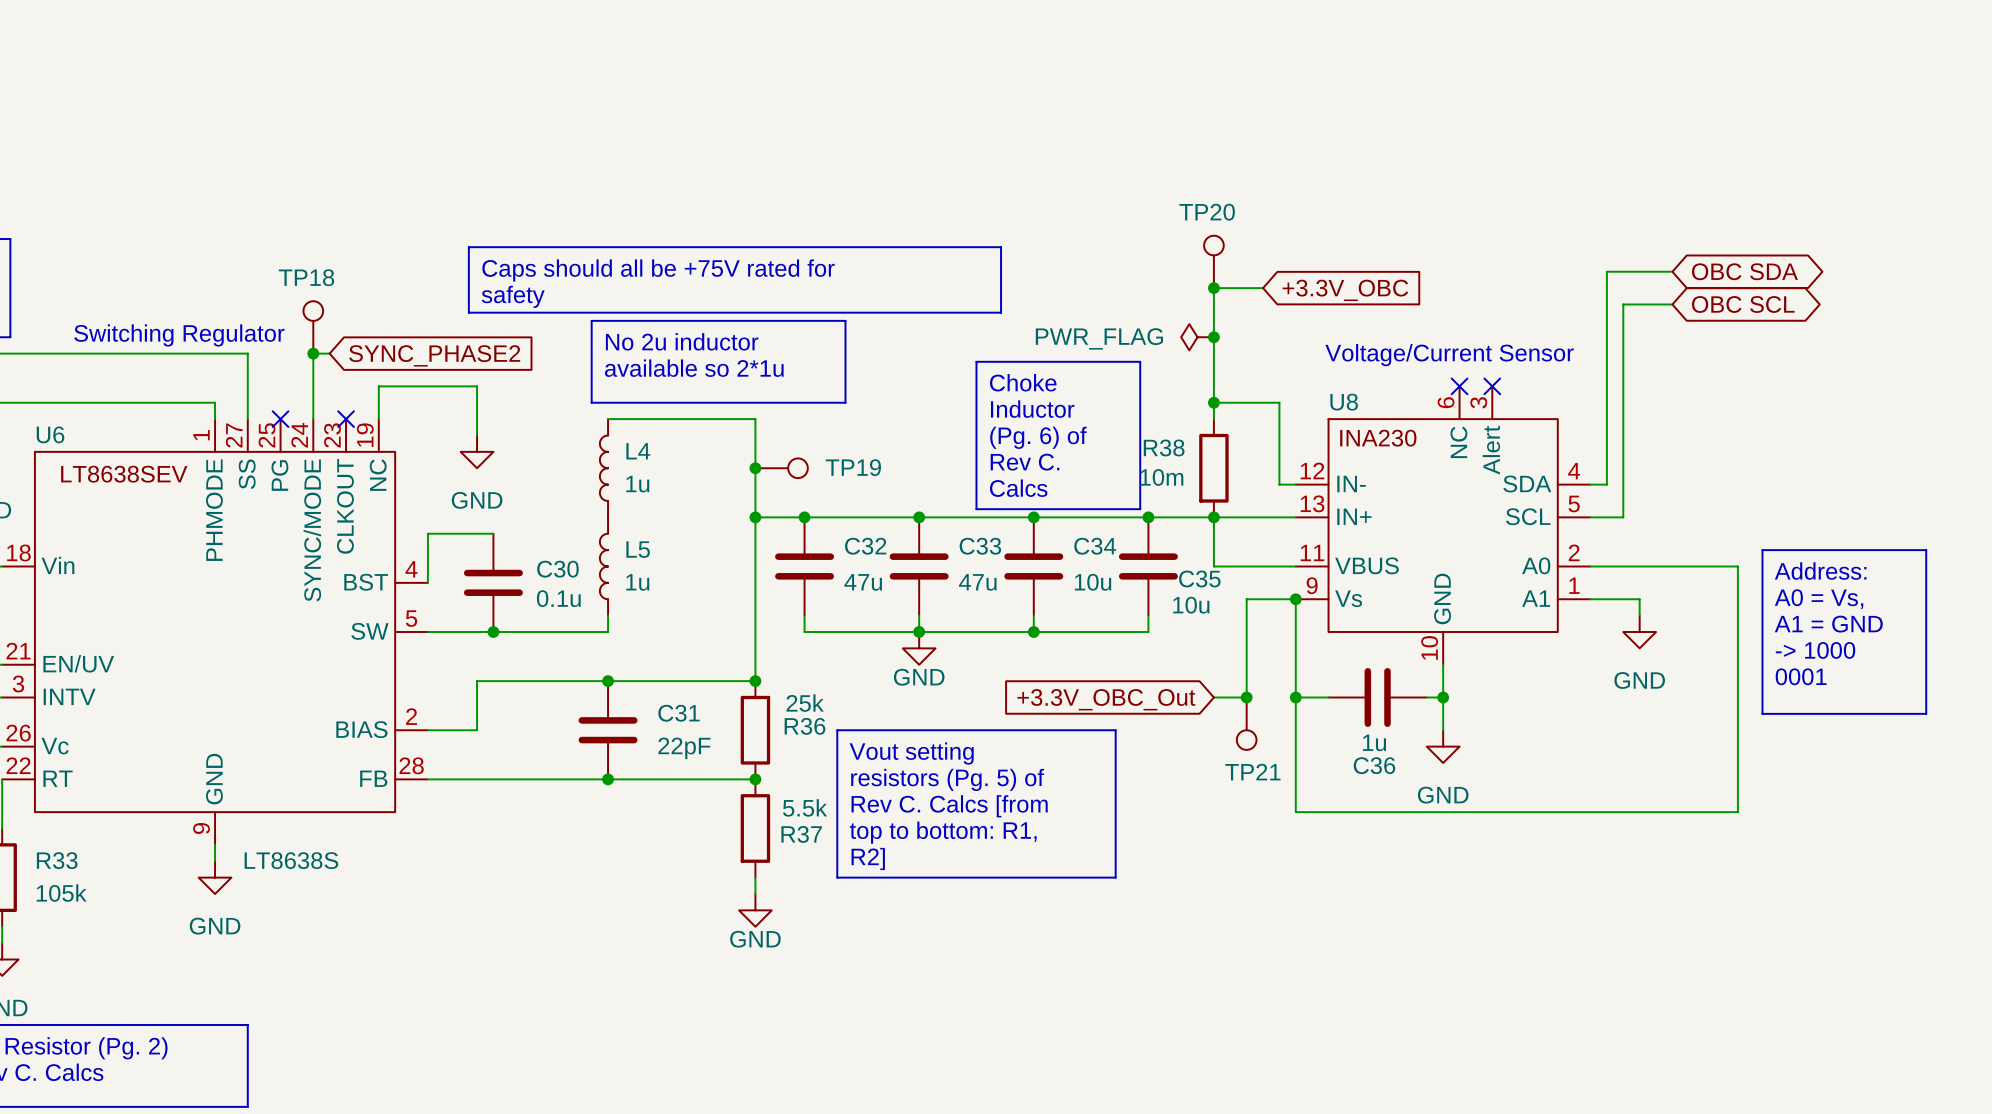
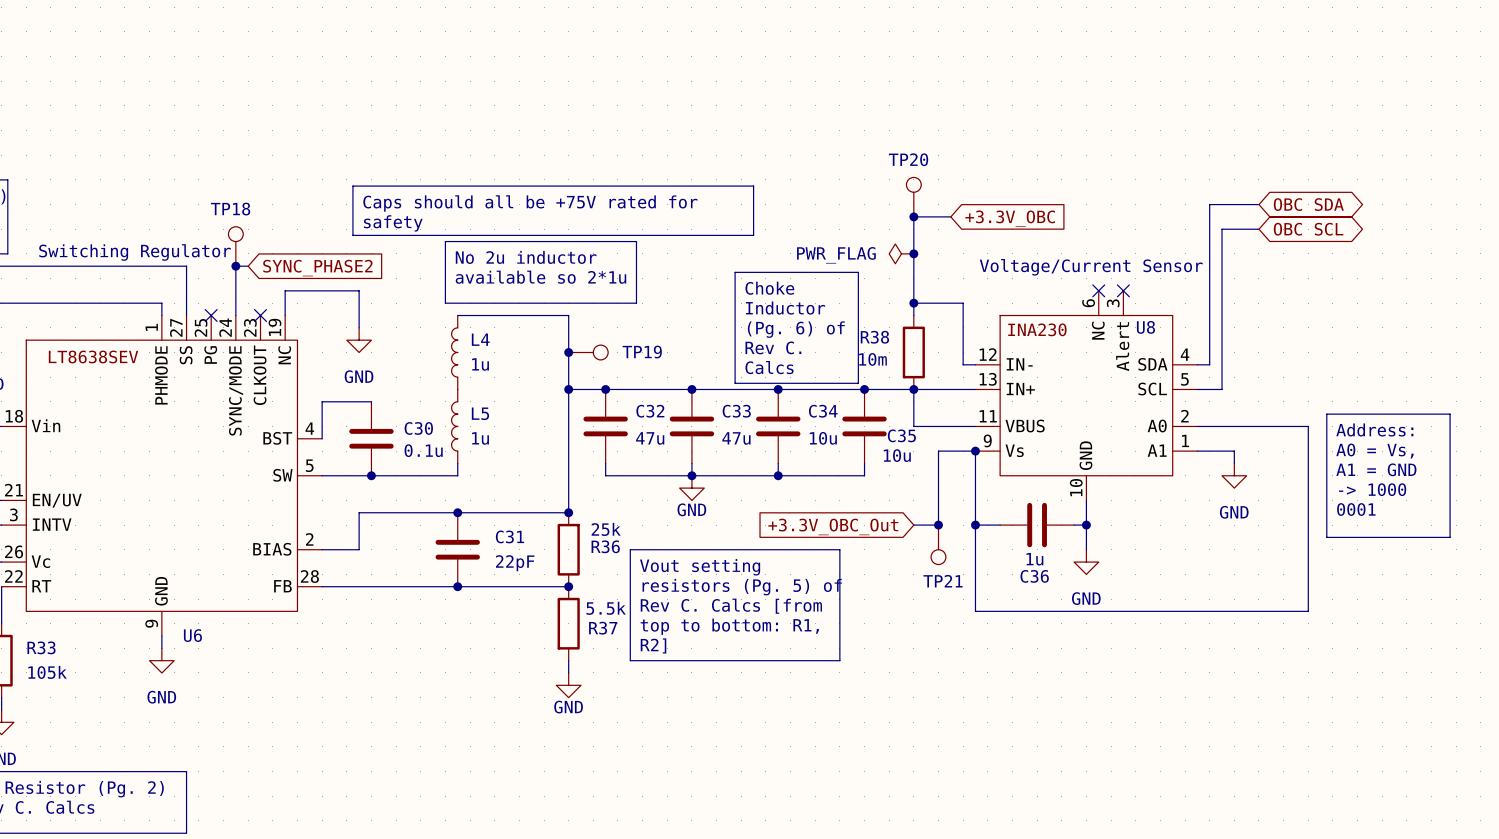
U8 name position: U8 (1344, 402) -> U8 (1145, 327)
U6 name position: U6 (50, 434) -> U6 (192, 635)
U6 value: LT8638S (291, 860) -> none

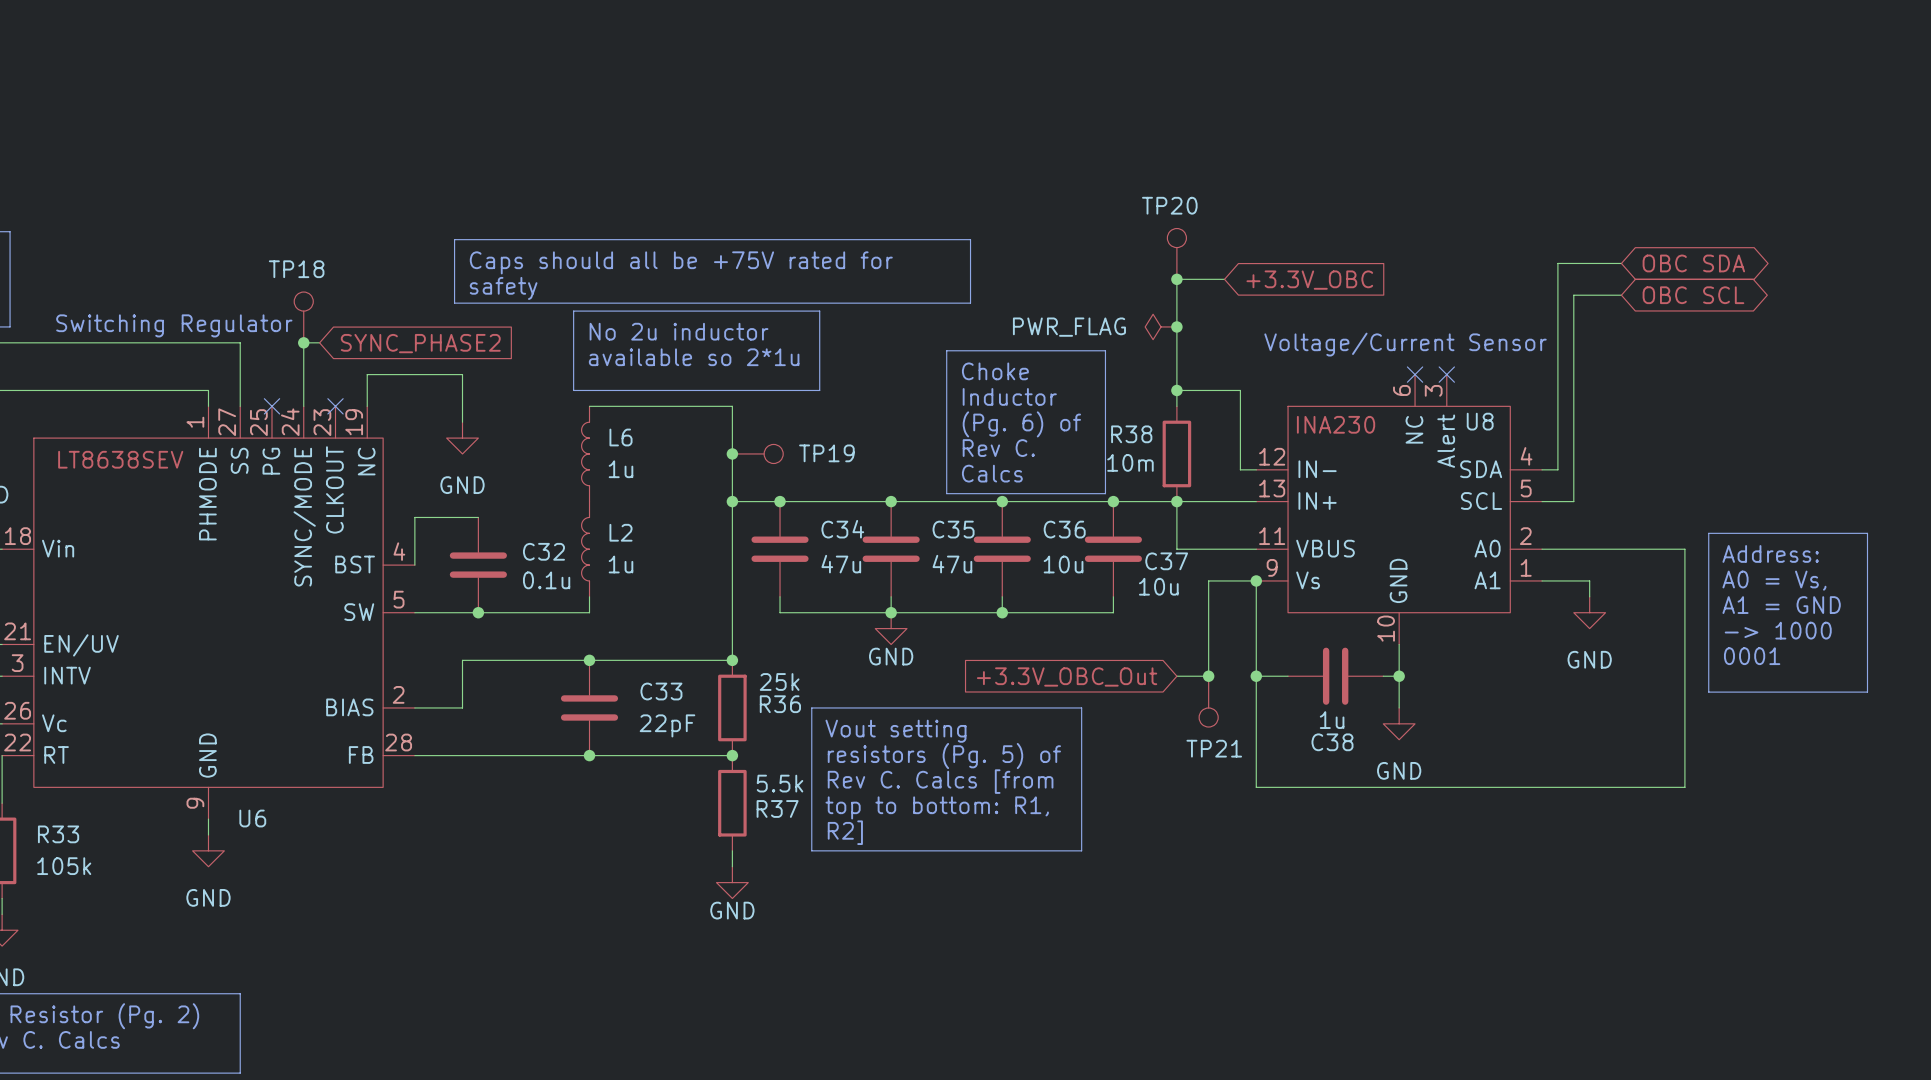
L4 name: L4 (480, 339) -> L6 (621, 437)
C32 name: C32 (650, 411) -> C34 (842, 529)
C33 name: C33 (736, 411) -> C35 (953, 529)
C34 name: C34 (823, 411) -> C36 (1064, 529)
L5 name: L5 (480, 413) -> L2 (621, 532)
C30 name: C30 (418, 428) -> C32 (543, 551)
C35 name: C35 (901, 435) -> C37 (1166, 561)
C31 name: C31 (509, 536) -> C33 (661, 691)
C36 name: C36 (1034, 576) -> C38 (1332, 742)

